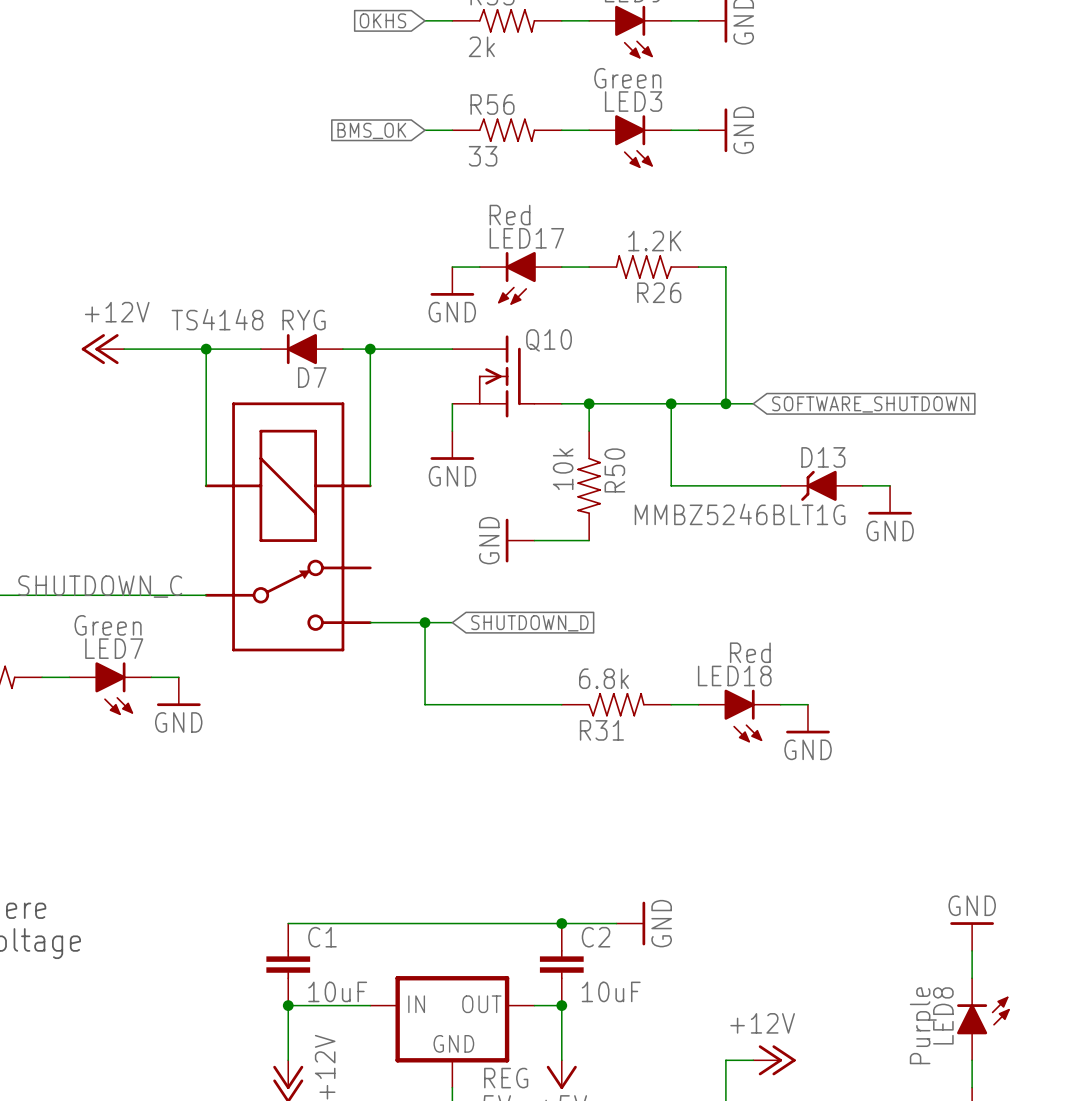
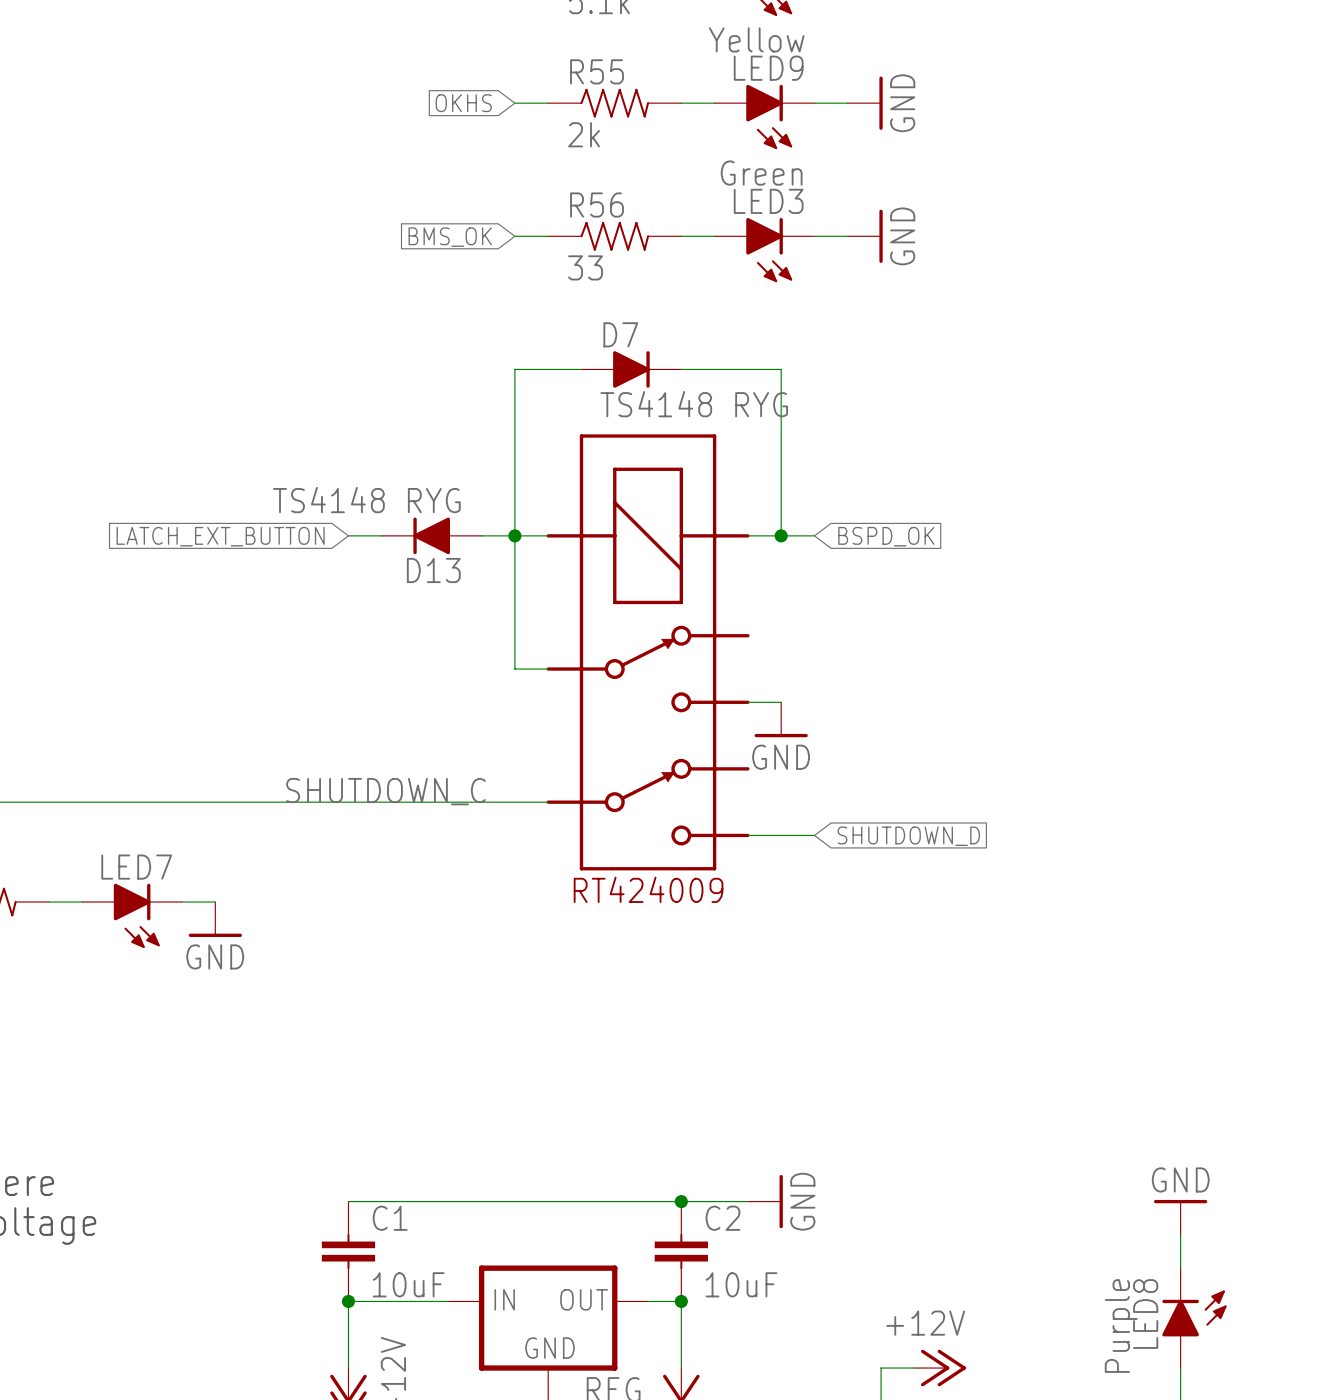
wire: none -> (581, 369) (514, 369) (514, 669) (548, 669)
wire: none -> (681, 369) (781, 369) (781, 535)
wire: (452, 267) (479, 267) -> (348, 535) (381, 535)
wire: (561, 267) (589, 267) -> none
R26: 1.2K (643, 267) -> none
wire: (698, 267) (725, 267) (725, 403) -> none
LED17: Red (520, 278) -> none
power symbol: GND (452, 281) -> none
power symbol: +12V (102, 349) -> none
wire: (124, 349) (260, 349) -> none
wire: (206, 349) (206, 485) -> none
junction: (206, 349) -> none
D7 rotation: 0° (301, 349) -> 180° (631, 369)
D7 position: (301, 349) -> (631, 369)
wire: (342, 349) (452, 349) -> none
wire: (370, 349) (370, 485) -> none
junction position: (370, 349) -> (514, 535)
wire: none -> (481, 535) (548, 535)
Q10: (507, 376) -> none
wire: none -> (747, 535) (814, 535)
junction: none -> (781, 535)
global label: none -> LATCH_EXT_BUTTON (220, 536)
global label: none -> BSPD_OK (886, 536)
wire: (452, 403) (452, 431) -> none
wire: (561, 403) (753, 403) -> none
junction: (589, 403) -> none
wire: (671, 403) (671, 485) (780, 485) -> none
junction: (671, 403) -> none
junction: (725, 403) -> none
global label: SOFTWARE_SHUTDOWN (870, 404) -> none
power symbol: GND (452, 445) -> none
D13 name position: D13 (823, 457) -> D13 (433, 570)
D13 symbol: [780, 470, 863, 501] -> [381, 517, 482, 555]
part: none -> RT424009 (648, 652)
R50: 10k (589, 485) -> none
wire: (862, 485) (890, 485) -> none
power symbol: GND (890, 500) -> none
D13 value: MMBZ5246BLT1G (740, 514) -> TS4148 RYG (366, 500)
part: (288, 526) -> none
power symbol: none -> GND (781, 719)
power symbol: GND (520, 540) -> none
wire: (534, 540) (589, 540) -> (747, 835) (814, 835)
label position: SHUTDOWN_C (100, 586) -> SHUTDOWN_C (385, 791)
wire: none -> (248, 802) (548, 802)
wire: (370, 622) (452, 622) -> none
wire: (425, 622) (425, 704) (561, 704) -> none
junction: (425, 622) -> none
global label position: SHUTDOWN_D (529, 623) -> SHUTDOWN_D (908, 836)
LED7 value: Green (108, 625) -> none
R31: 6.8k (616, 704) -> none
wire: (671, 704) (698, 704) -> (747, 702) (781, 702)
wire: (780, 704) (807, 704) -> none
LED18: Red (739, 716) -> none
power symbol: GND (807, 719) -> none

